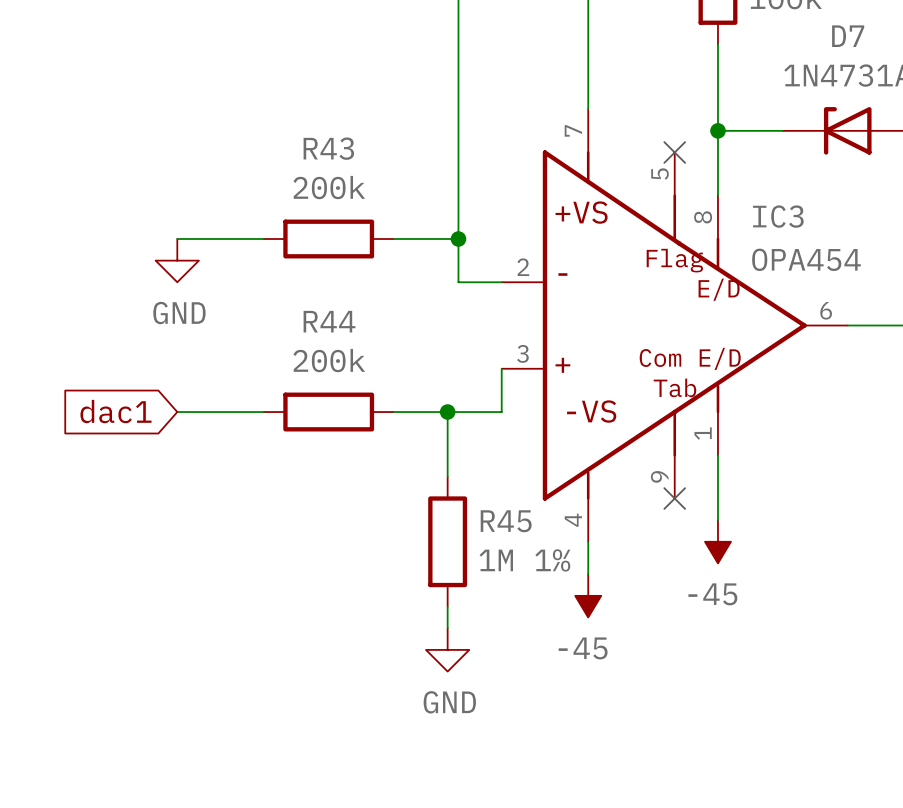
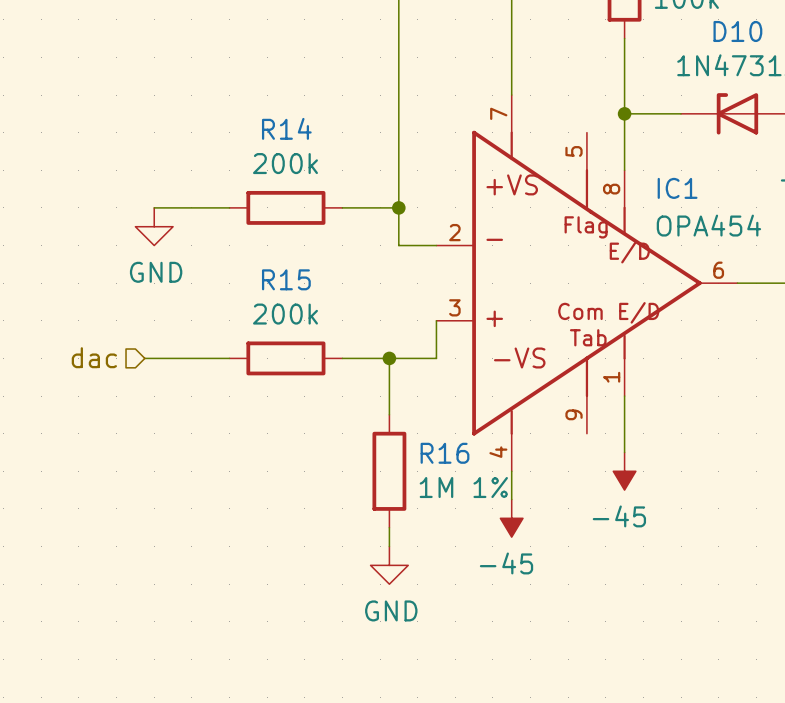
D7 name: D7 (848, 36) -> D10 (737, 31)
R43 name: R43 (328, 148) -> R14 (286, 128)
no-connect mark: (674, 152) -> none
IC3 name: IC3 (778, 216) -> IC1 (677, 188)
R44 name: R44 (329, 321) -> R15 (286, 279)
hierarchical label: none -> dac (94, 357)
global label: dac1 (115, 411) -> none
wire: none -> (144, 358) (154, 358)
no-connect mark: (674, 498) -> none
R45 name: R45 (506, 521) -> R16 (445, 453)

